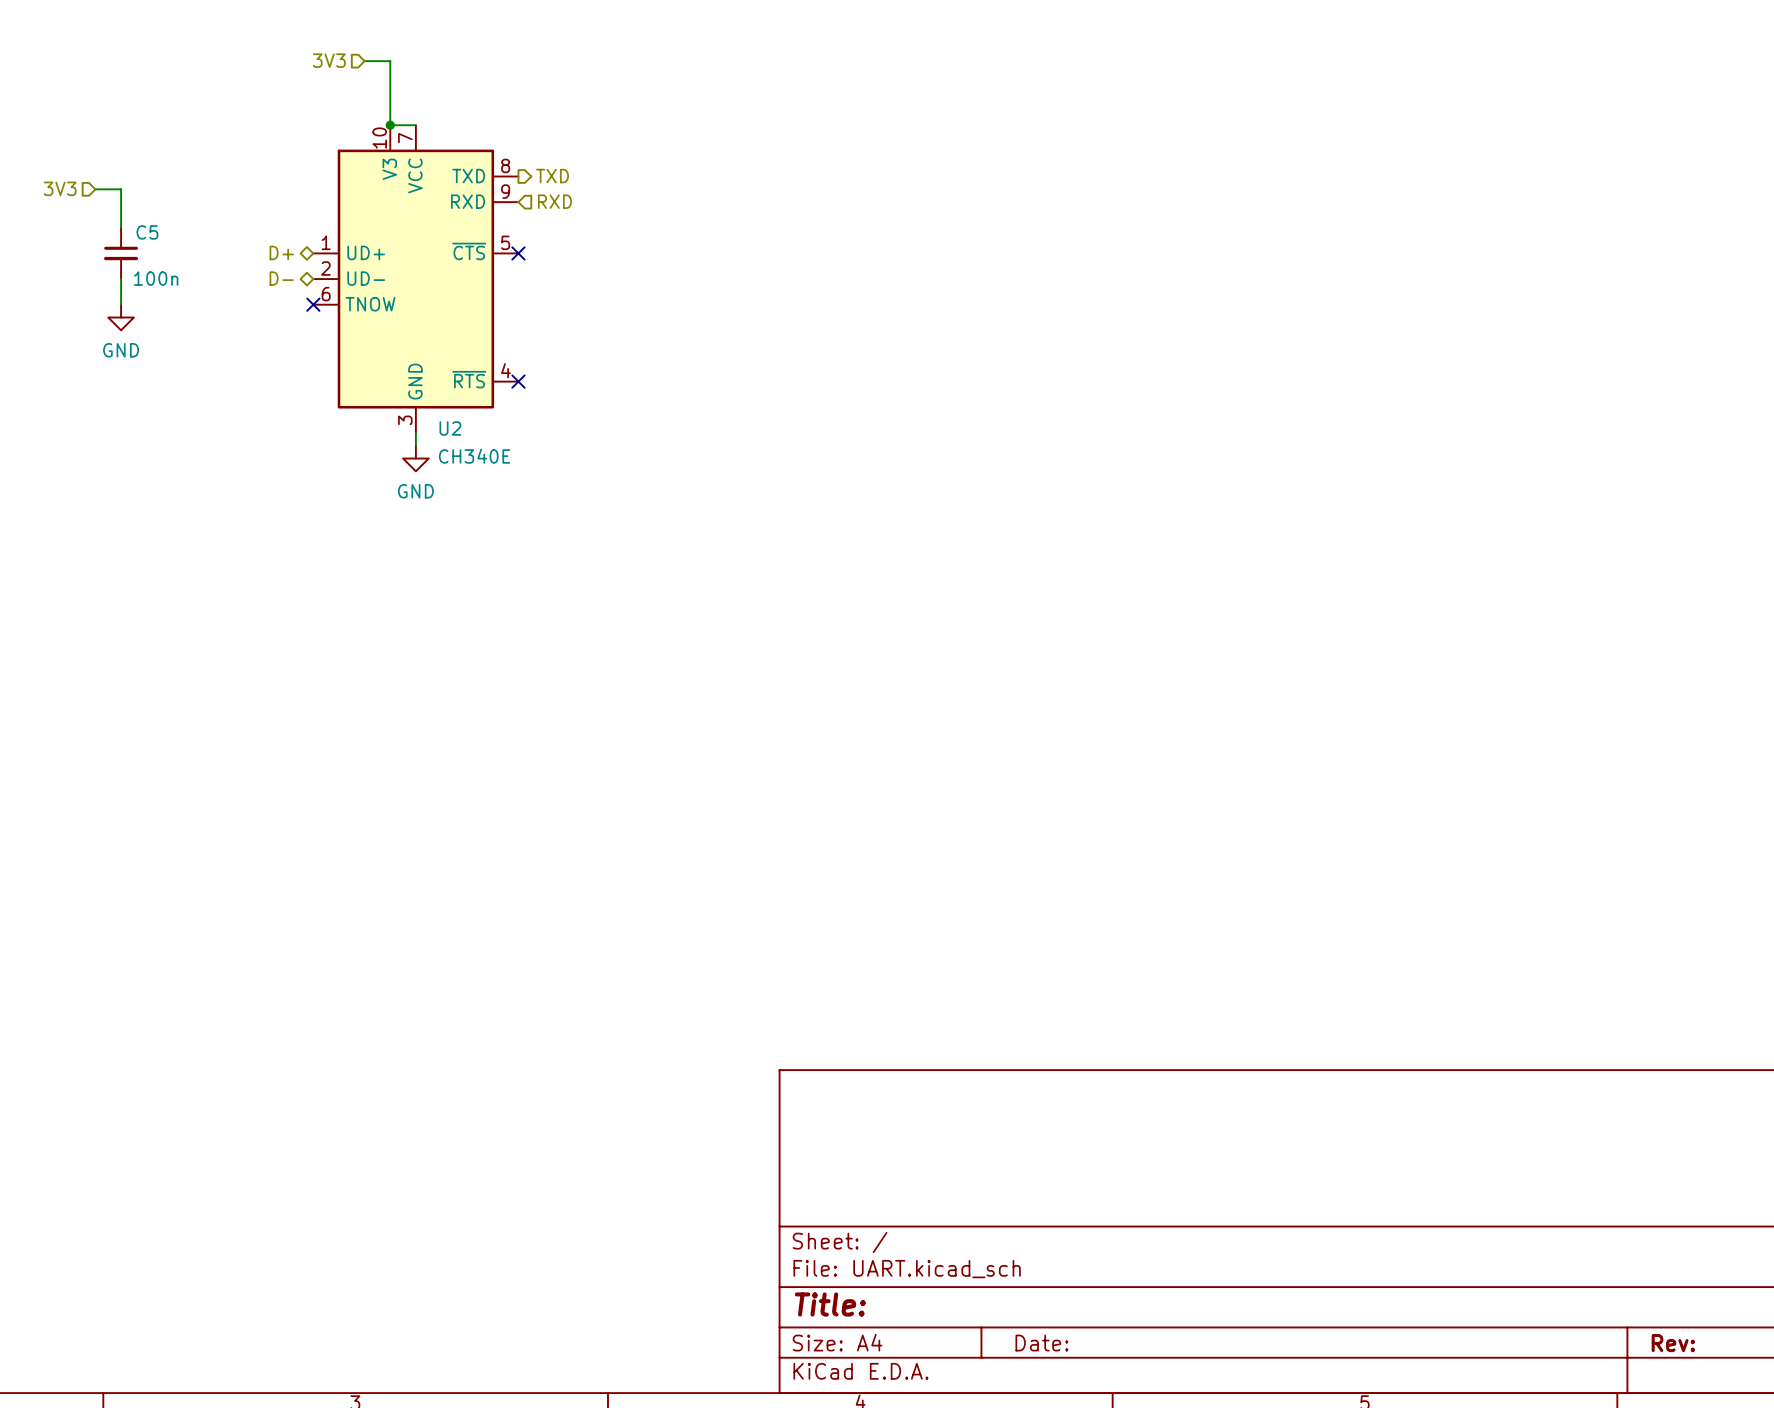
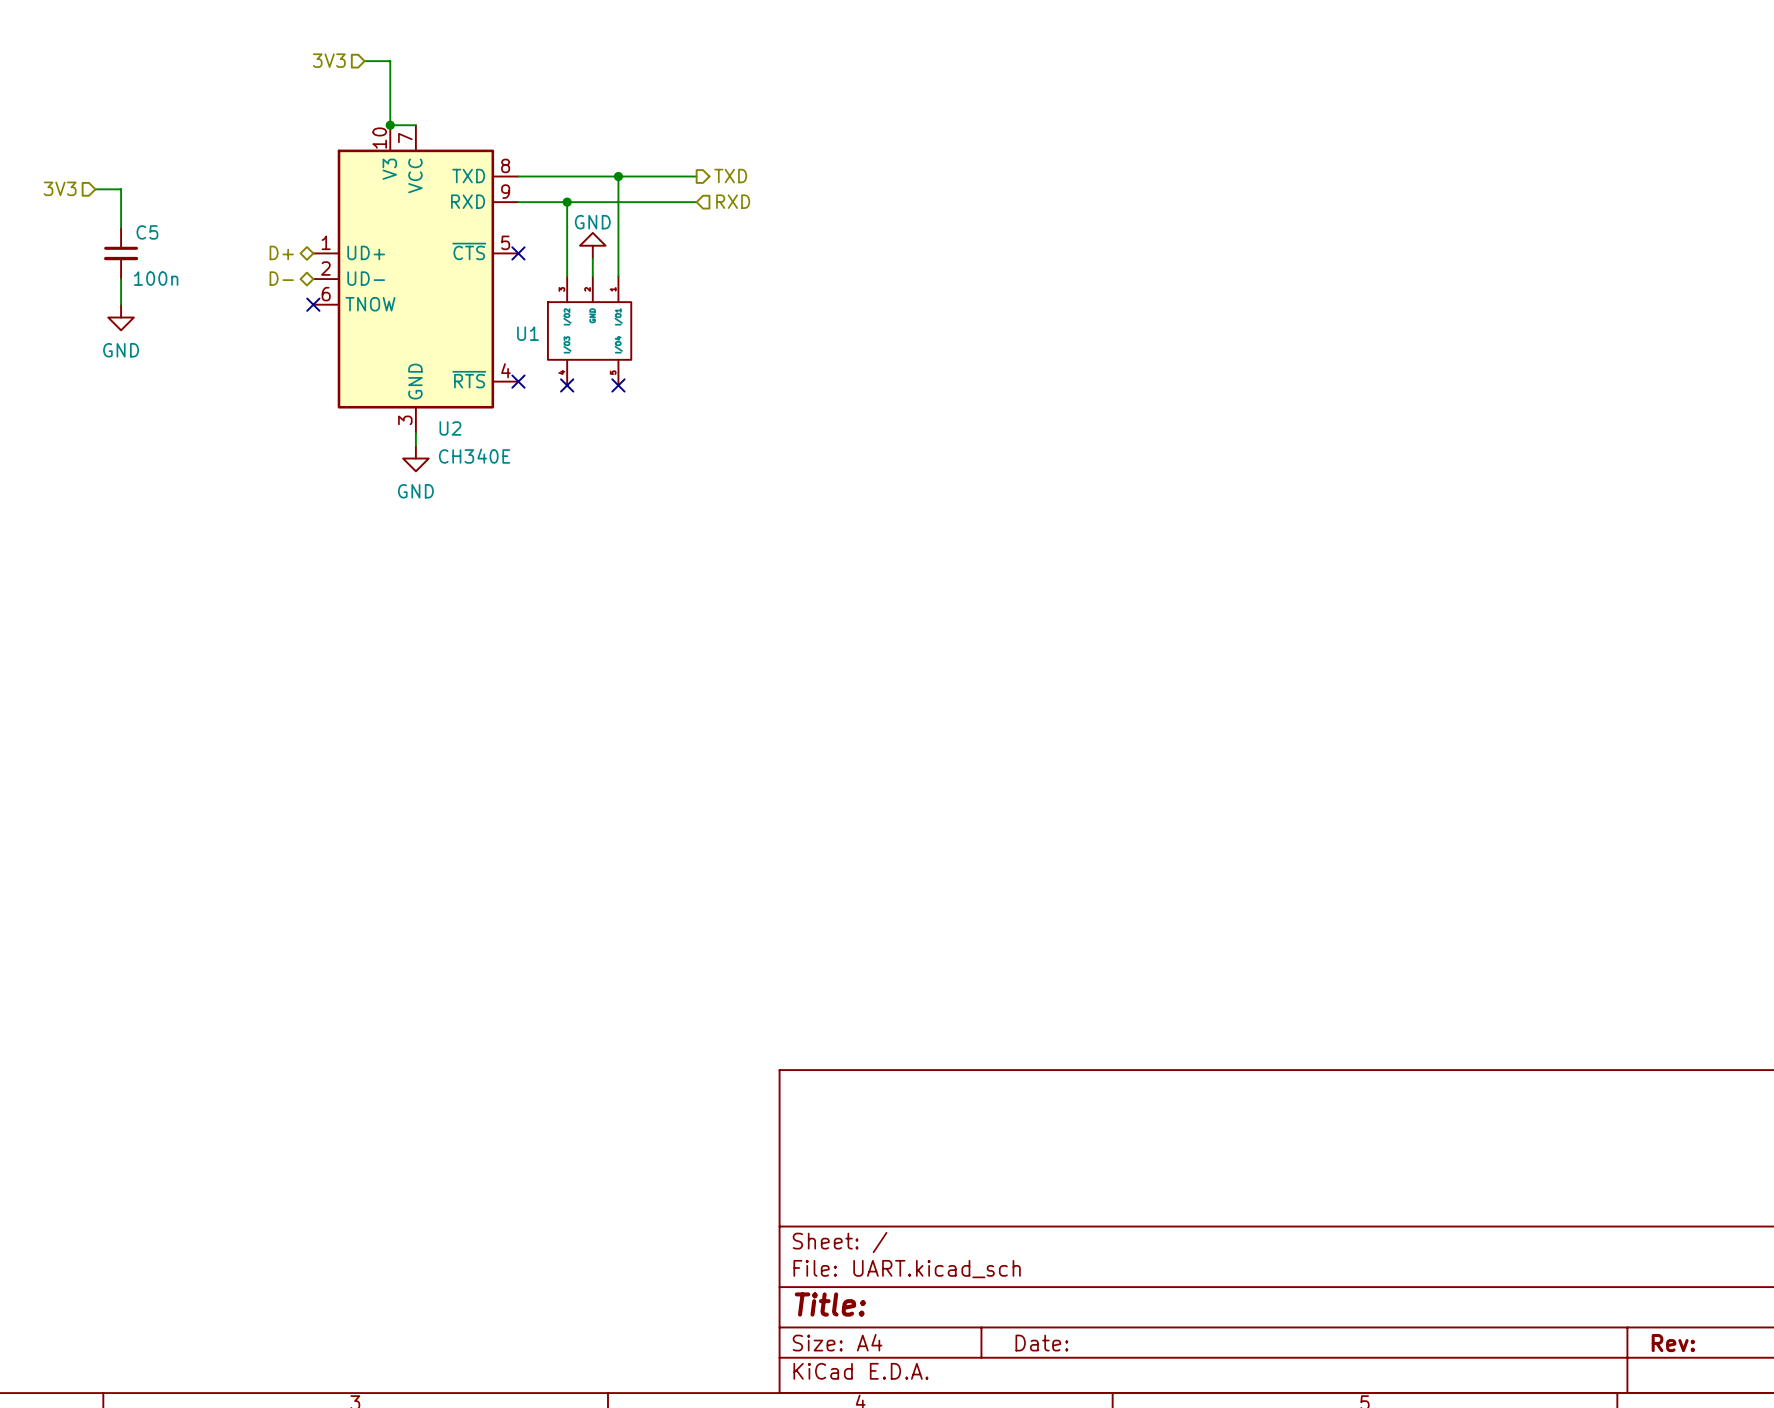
wire: none -> (518, 176) (696, 176)
hierarchical label position: TXD (552, 176) -> TXD (730, 176)
wire: none -> (618, 176) (618, 276)
junction: none -> (618, 176)
hierarchical label position: RXD (554, 201) -> RXD (733, 201)
wire: none -> (518, 202) (696, 202)
wire: none -> (567, 202) (567, 276)
junction: none -> (567, 202)
power symbol: none -> GND (592, 245)
wire: none -> (592, 258) (592, 276)
U1: none -> (589, 330)
no-connect mark: none -> (567, 385)
no-connect mark: none -> (618, 385)

